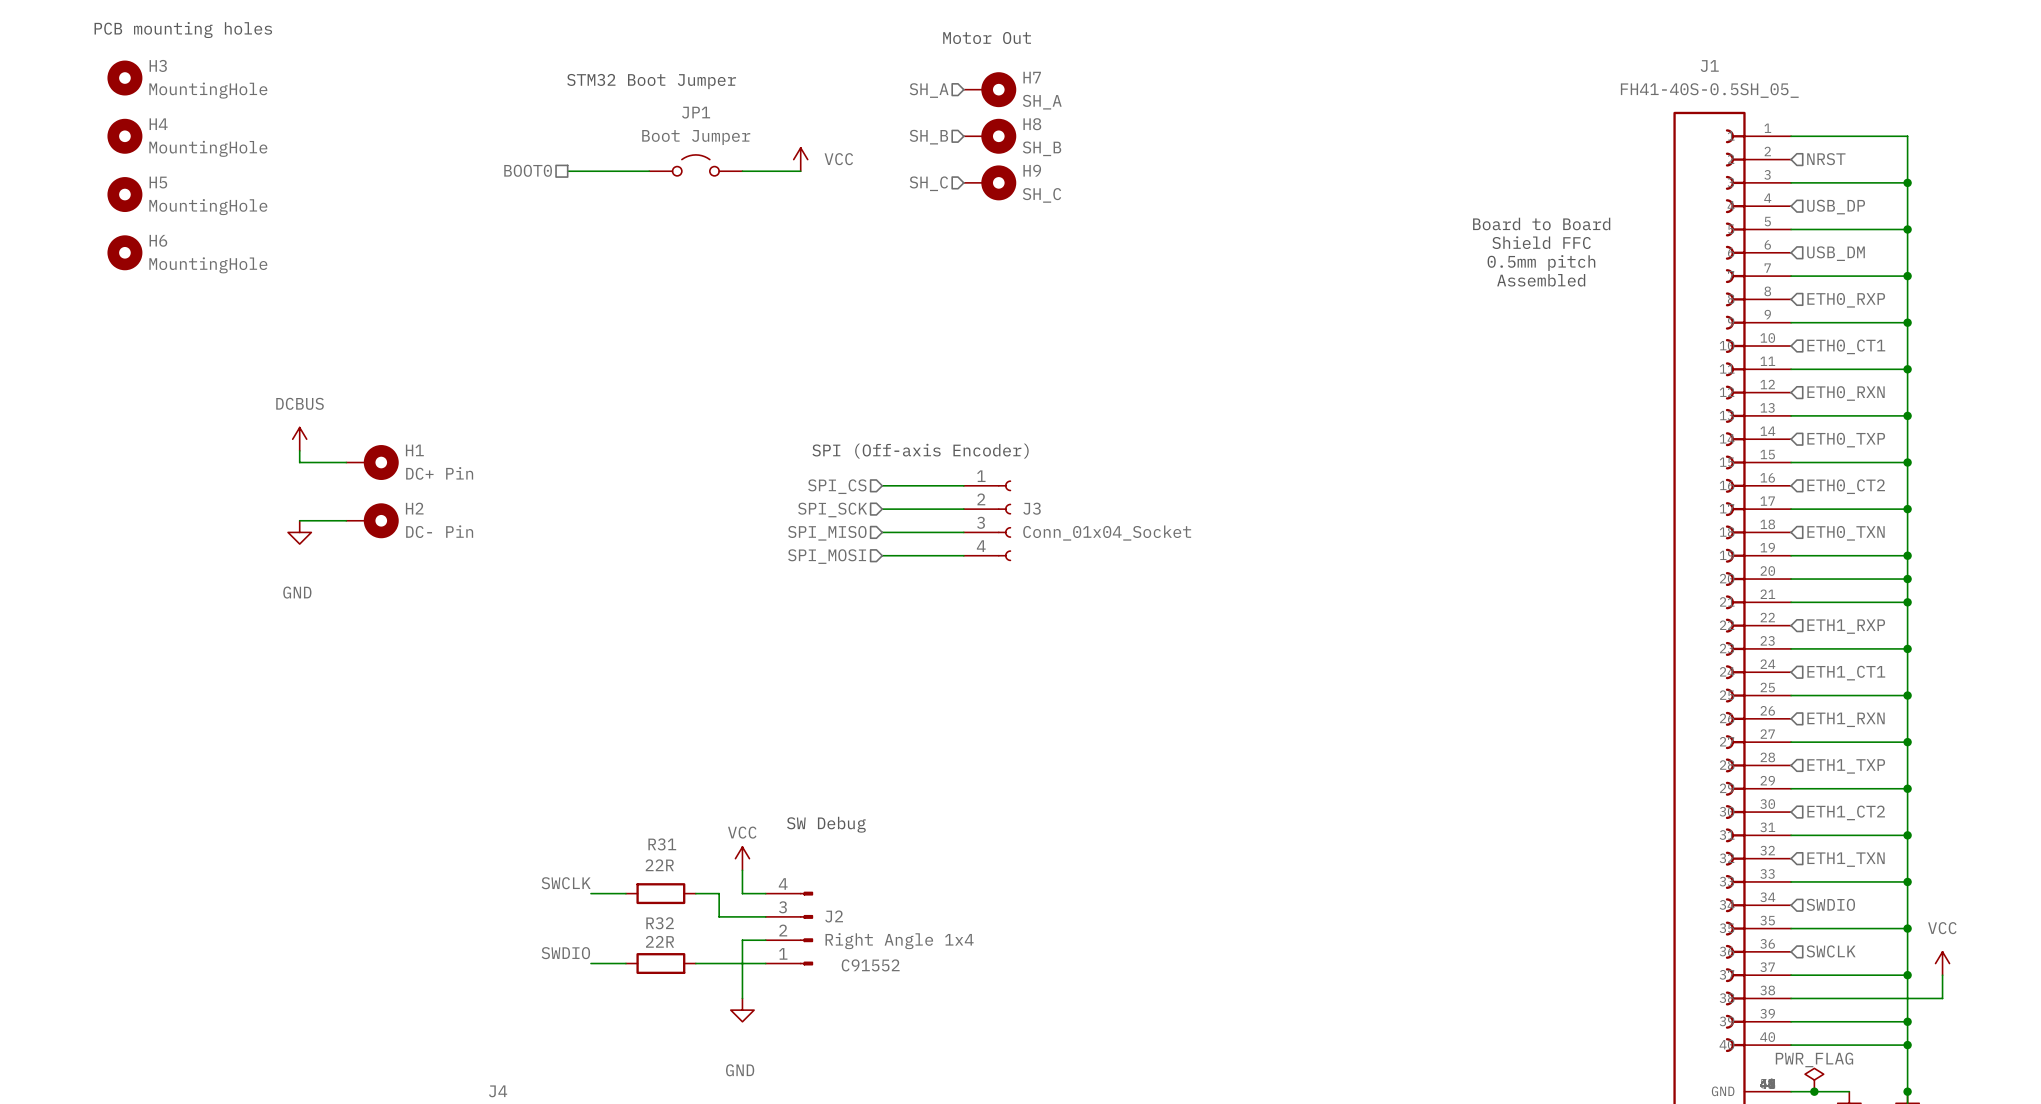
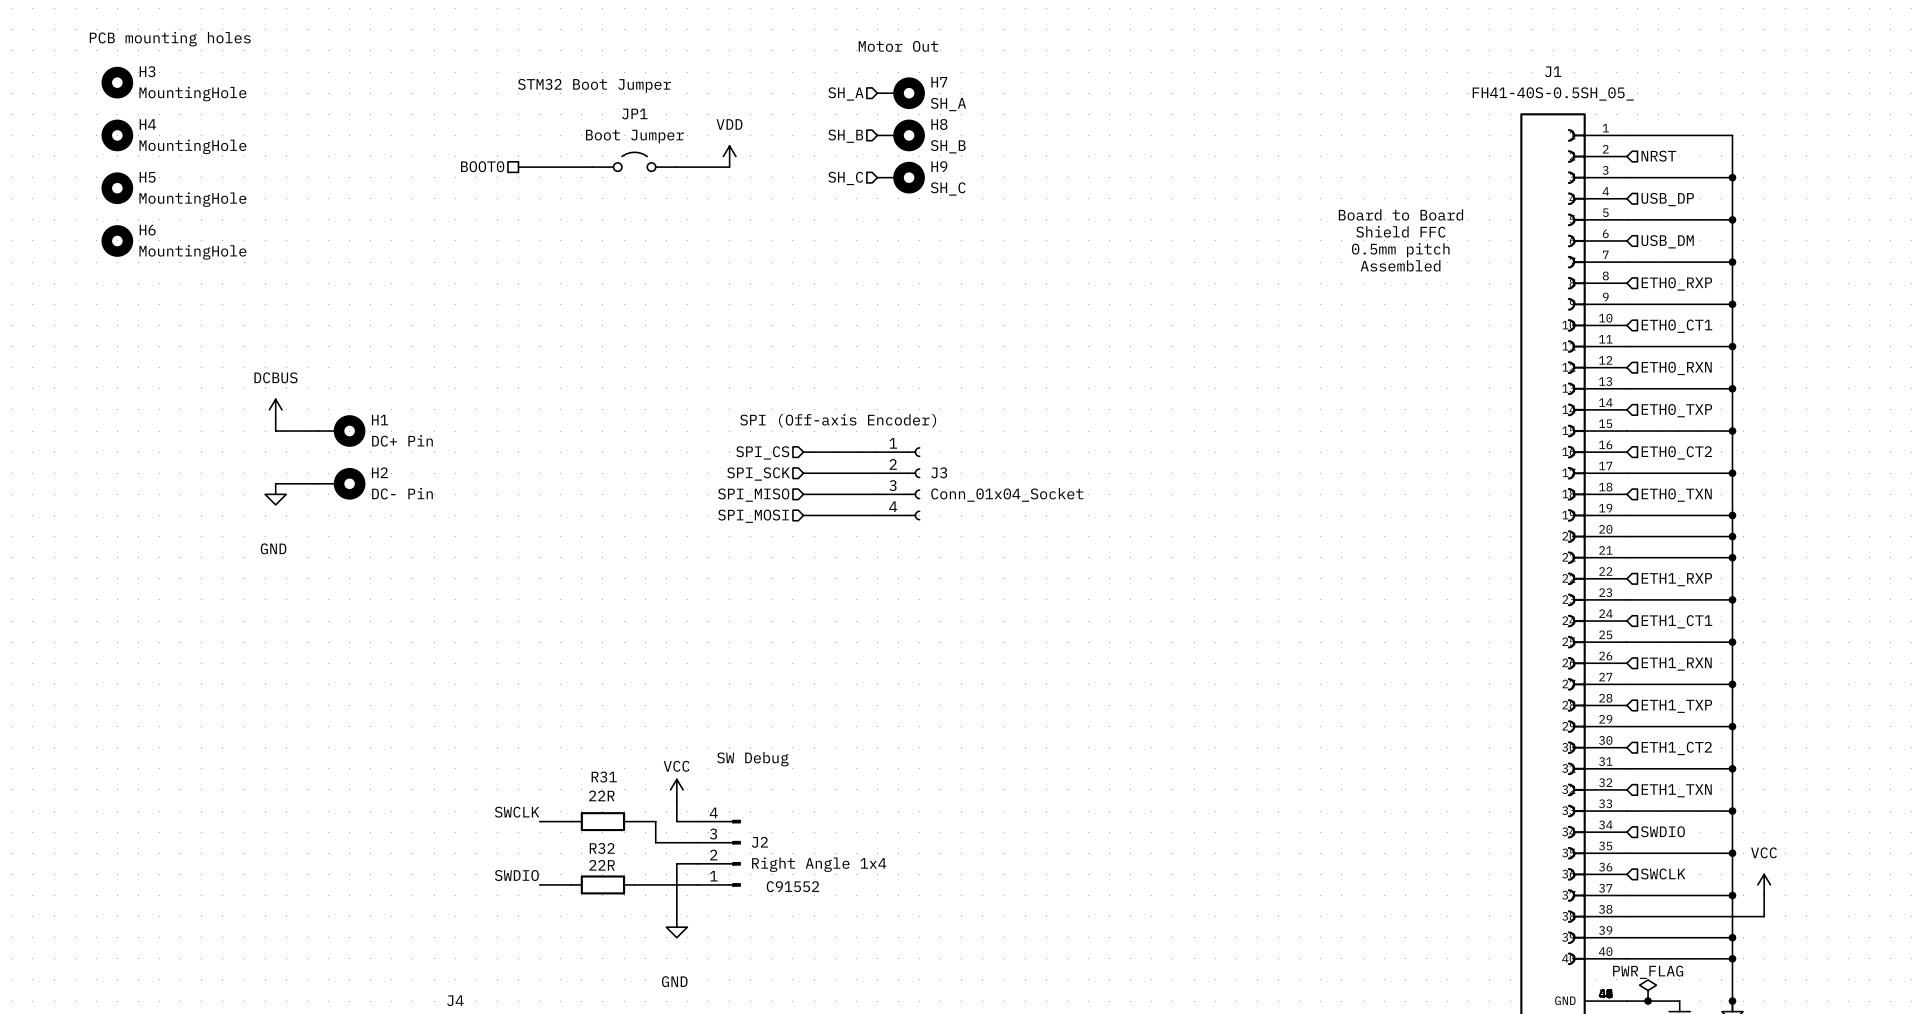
power symbol: VCC (800, 159) -> VDD (729, 156)

